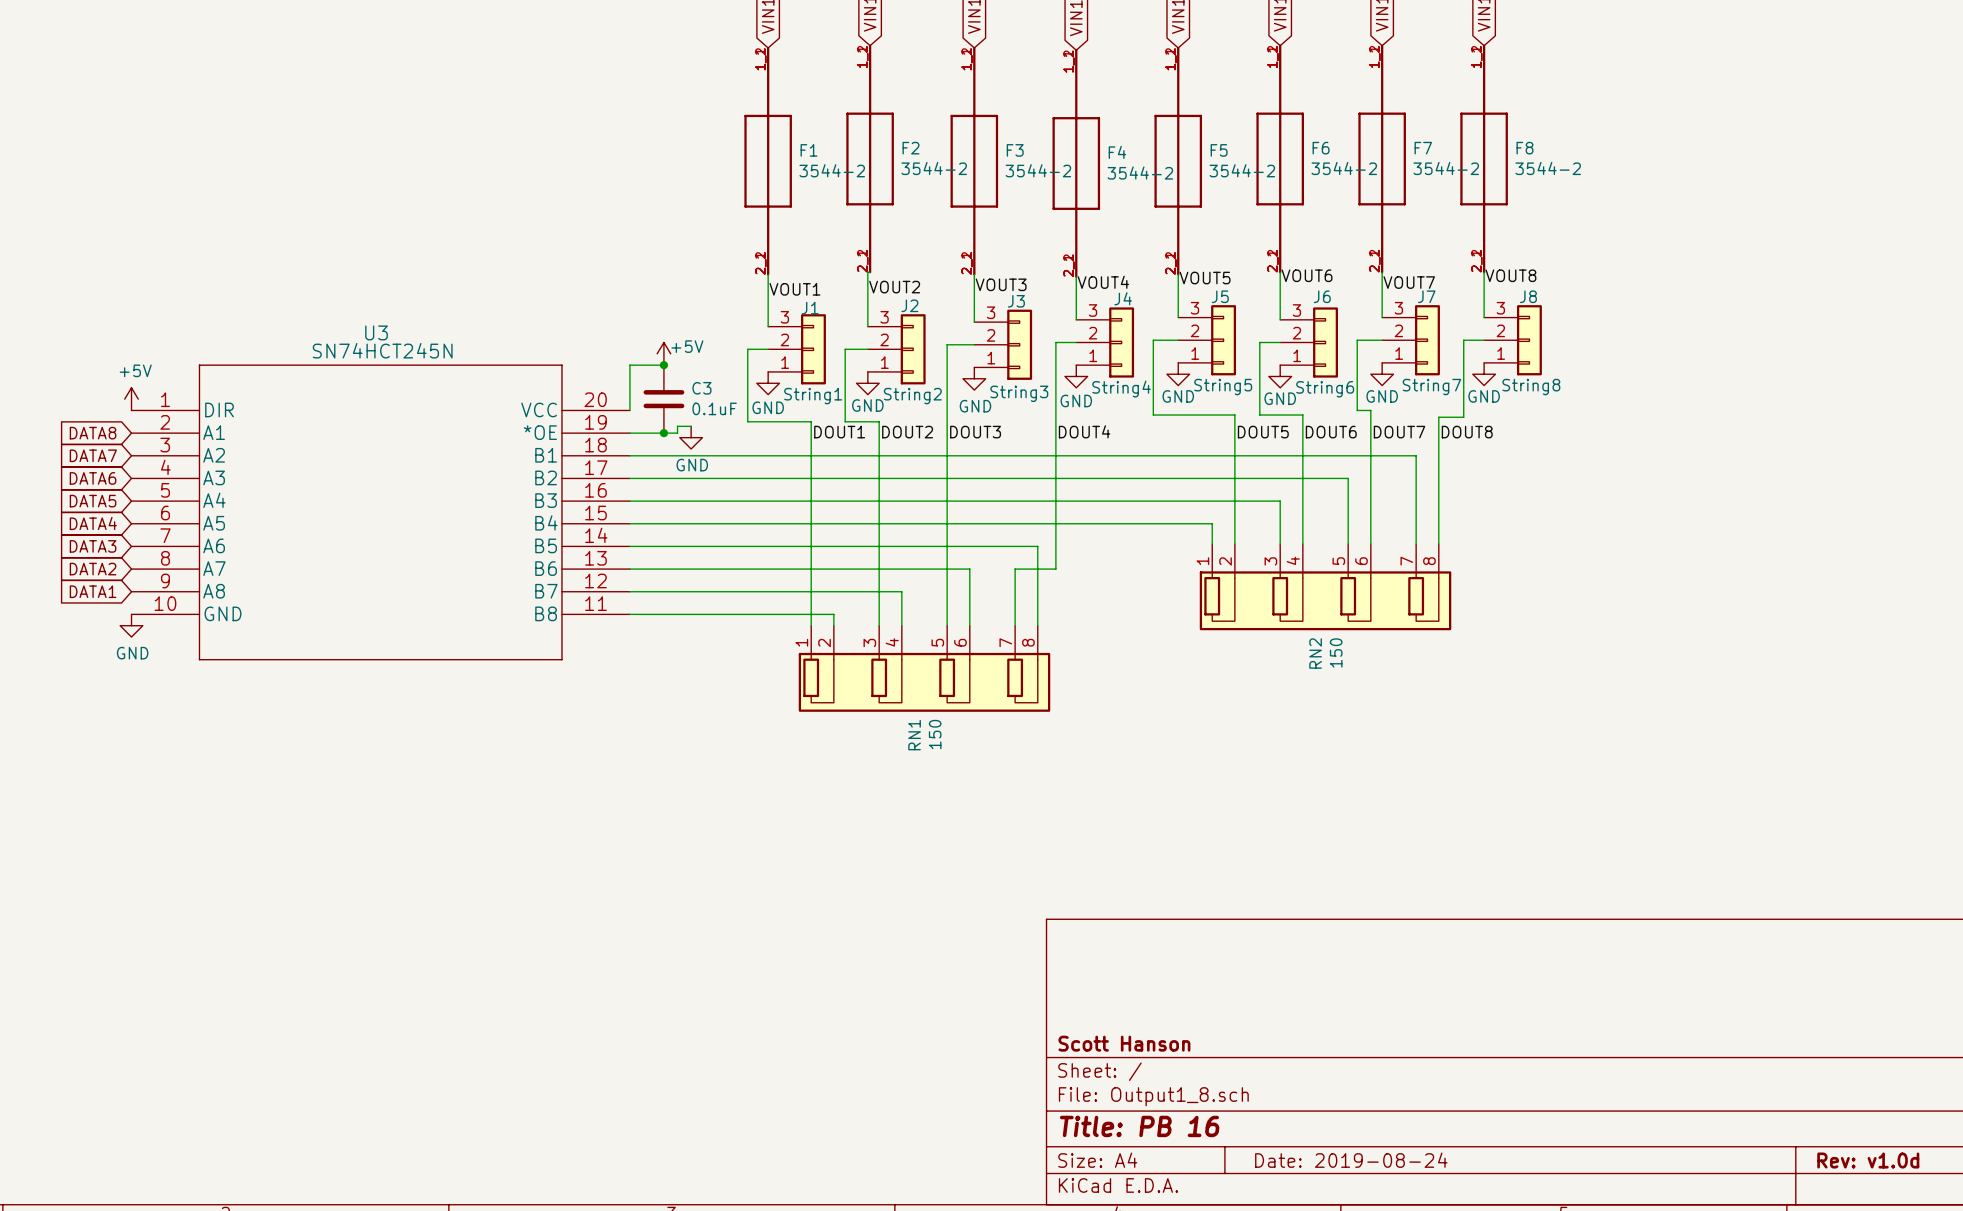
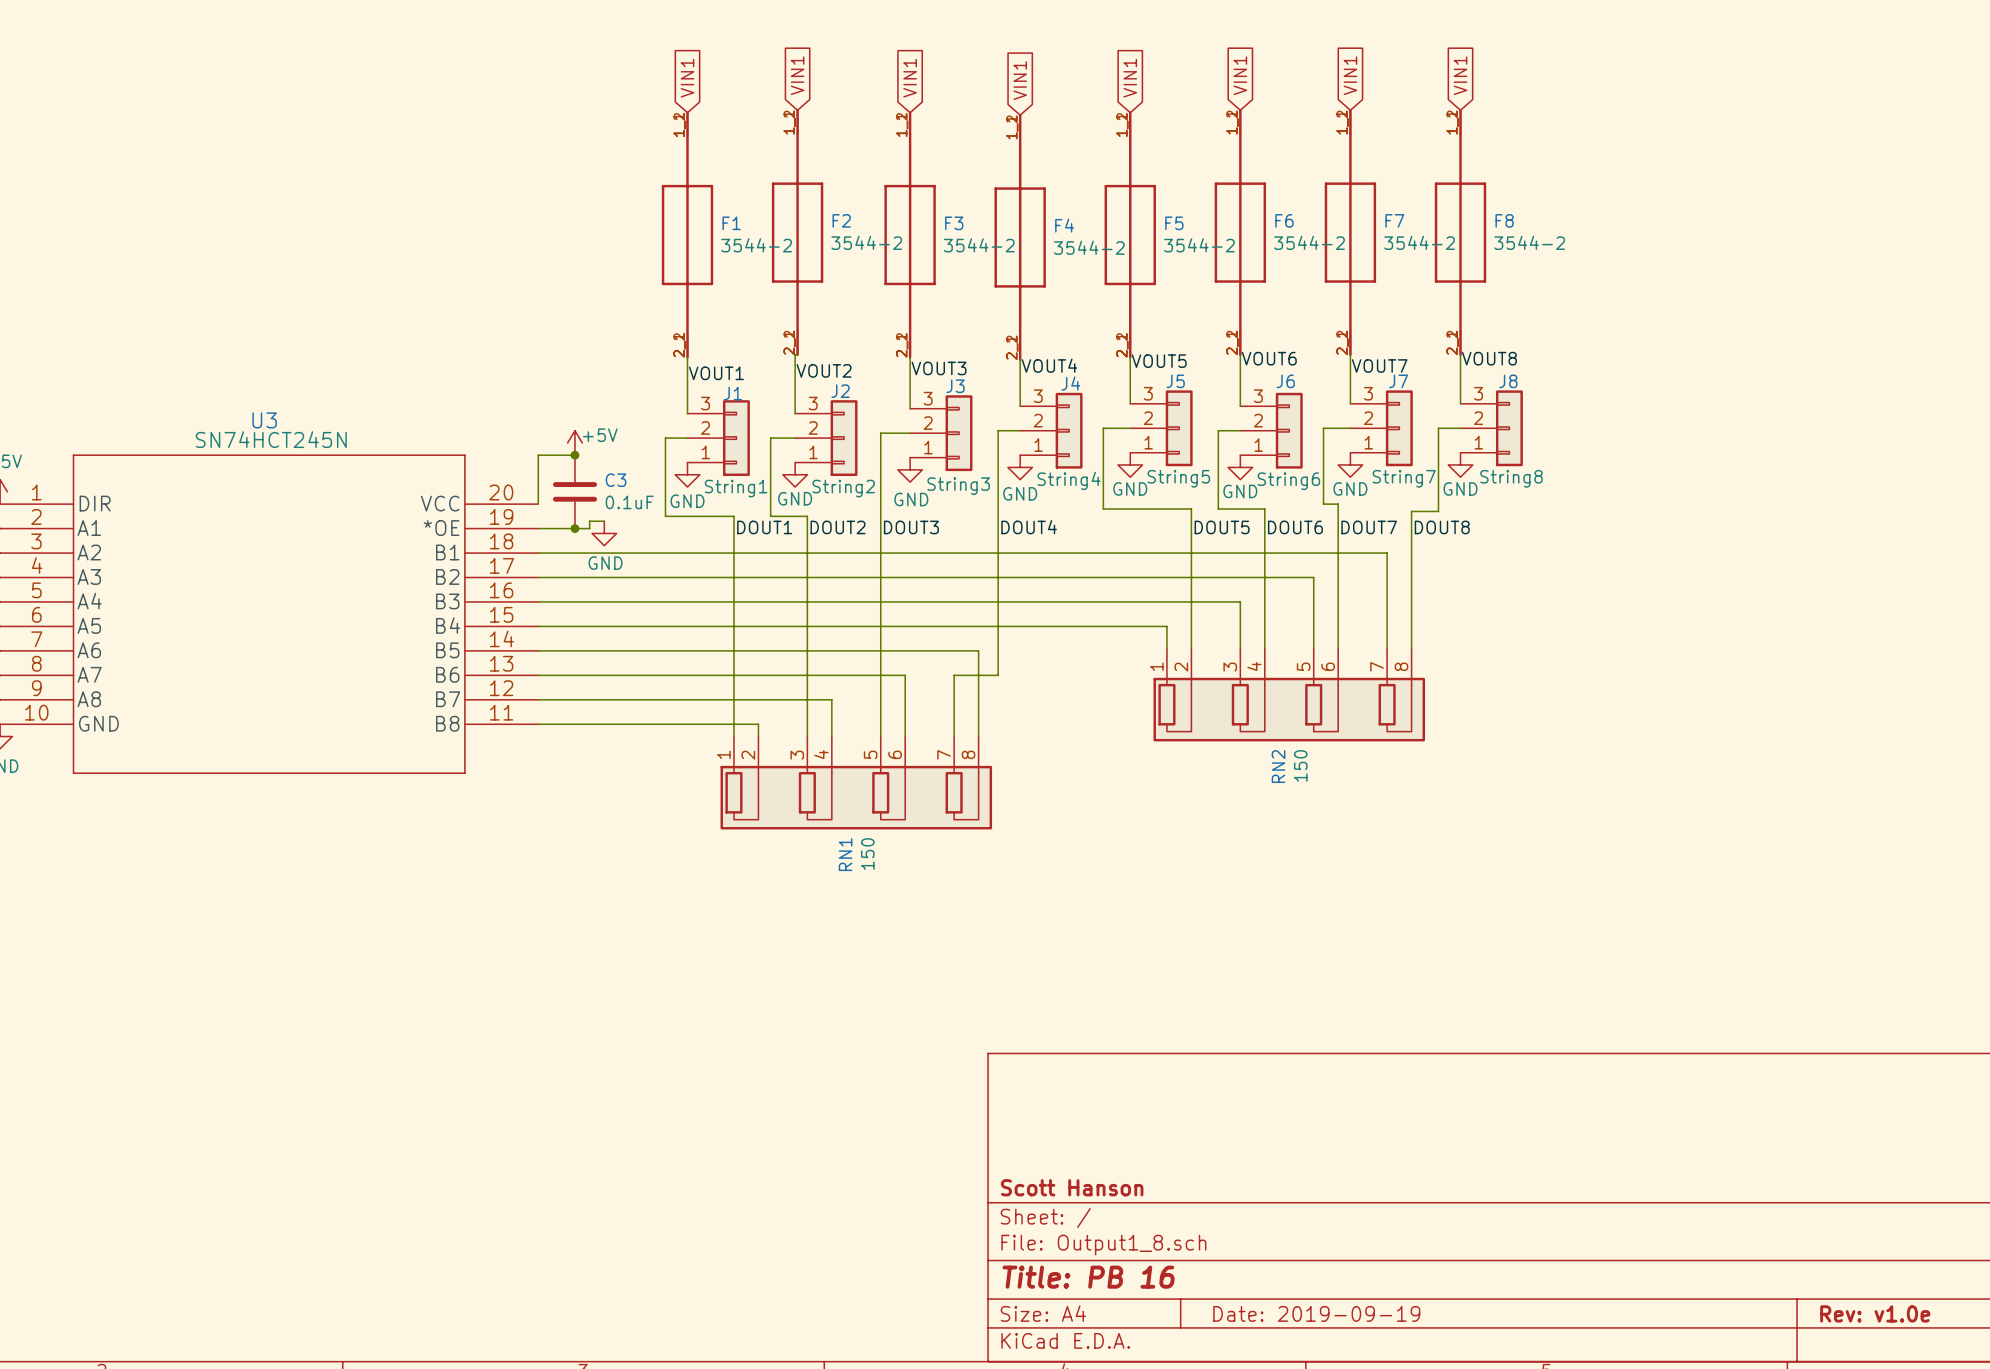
title block: Date: 2019-08-24 (1351, 1160) -> Date: 2019-09-19 (1316, 1313)
title block: Rev: v1.0d (1868, 1160) -> Rev: v1.0e (1875, 1313)

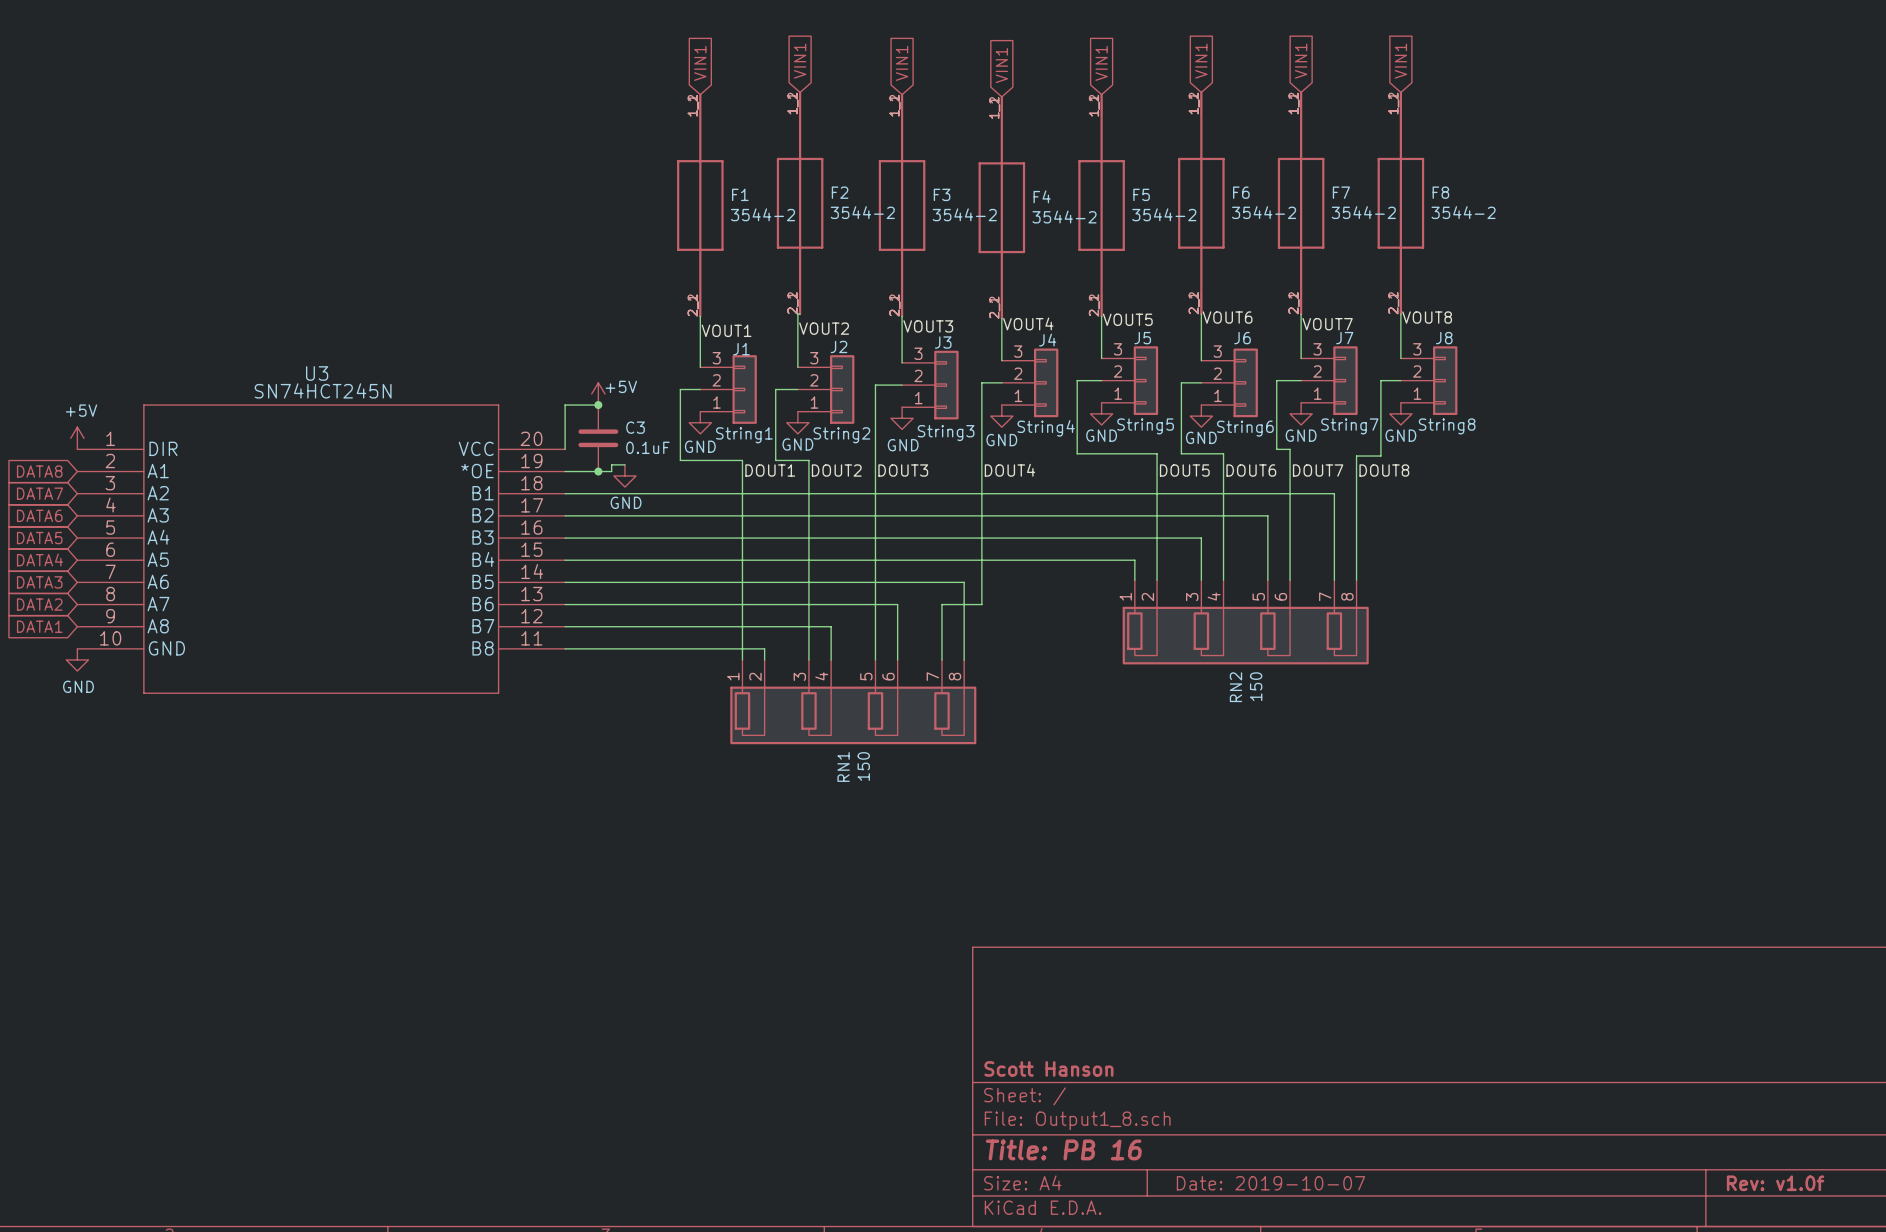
title block: Date: 2019-09-19 (1316, 1313) -> Date: 2019-10-07 (1270, 1183)
title block: Rev: v1.0e (1875, 1313) -> Rev: v1.0f (1775, 1183)

